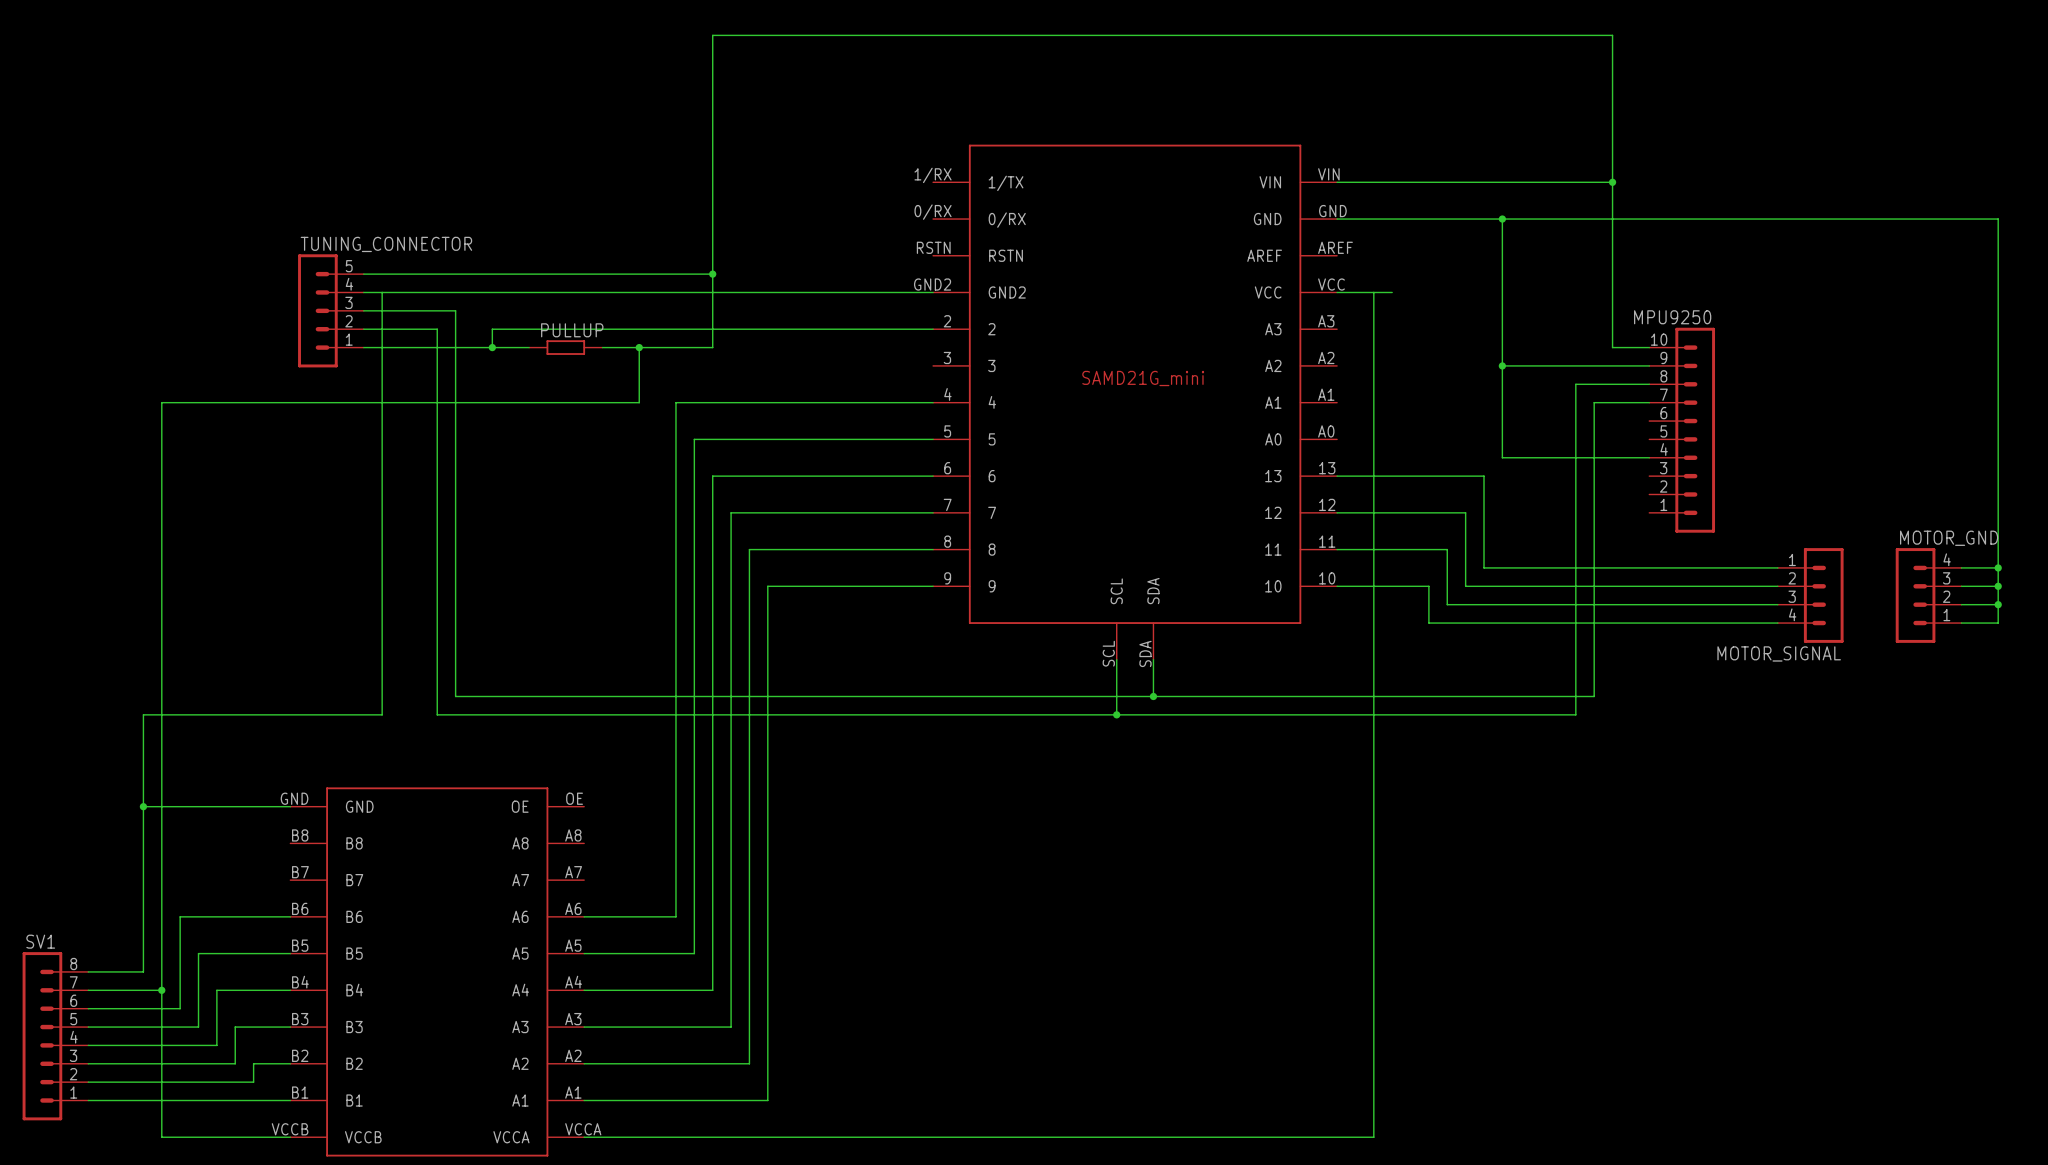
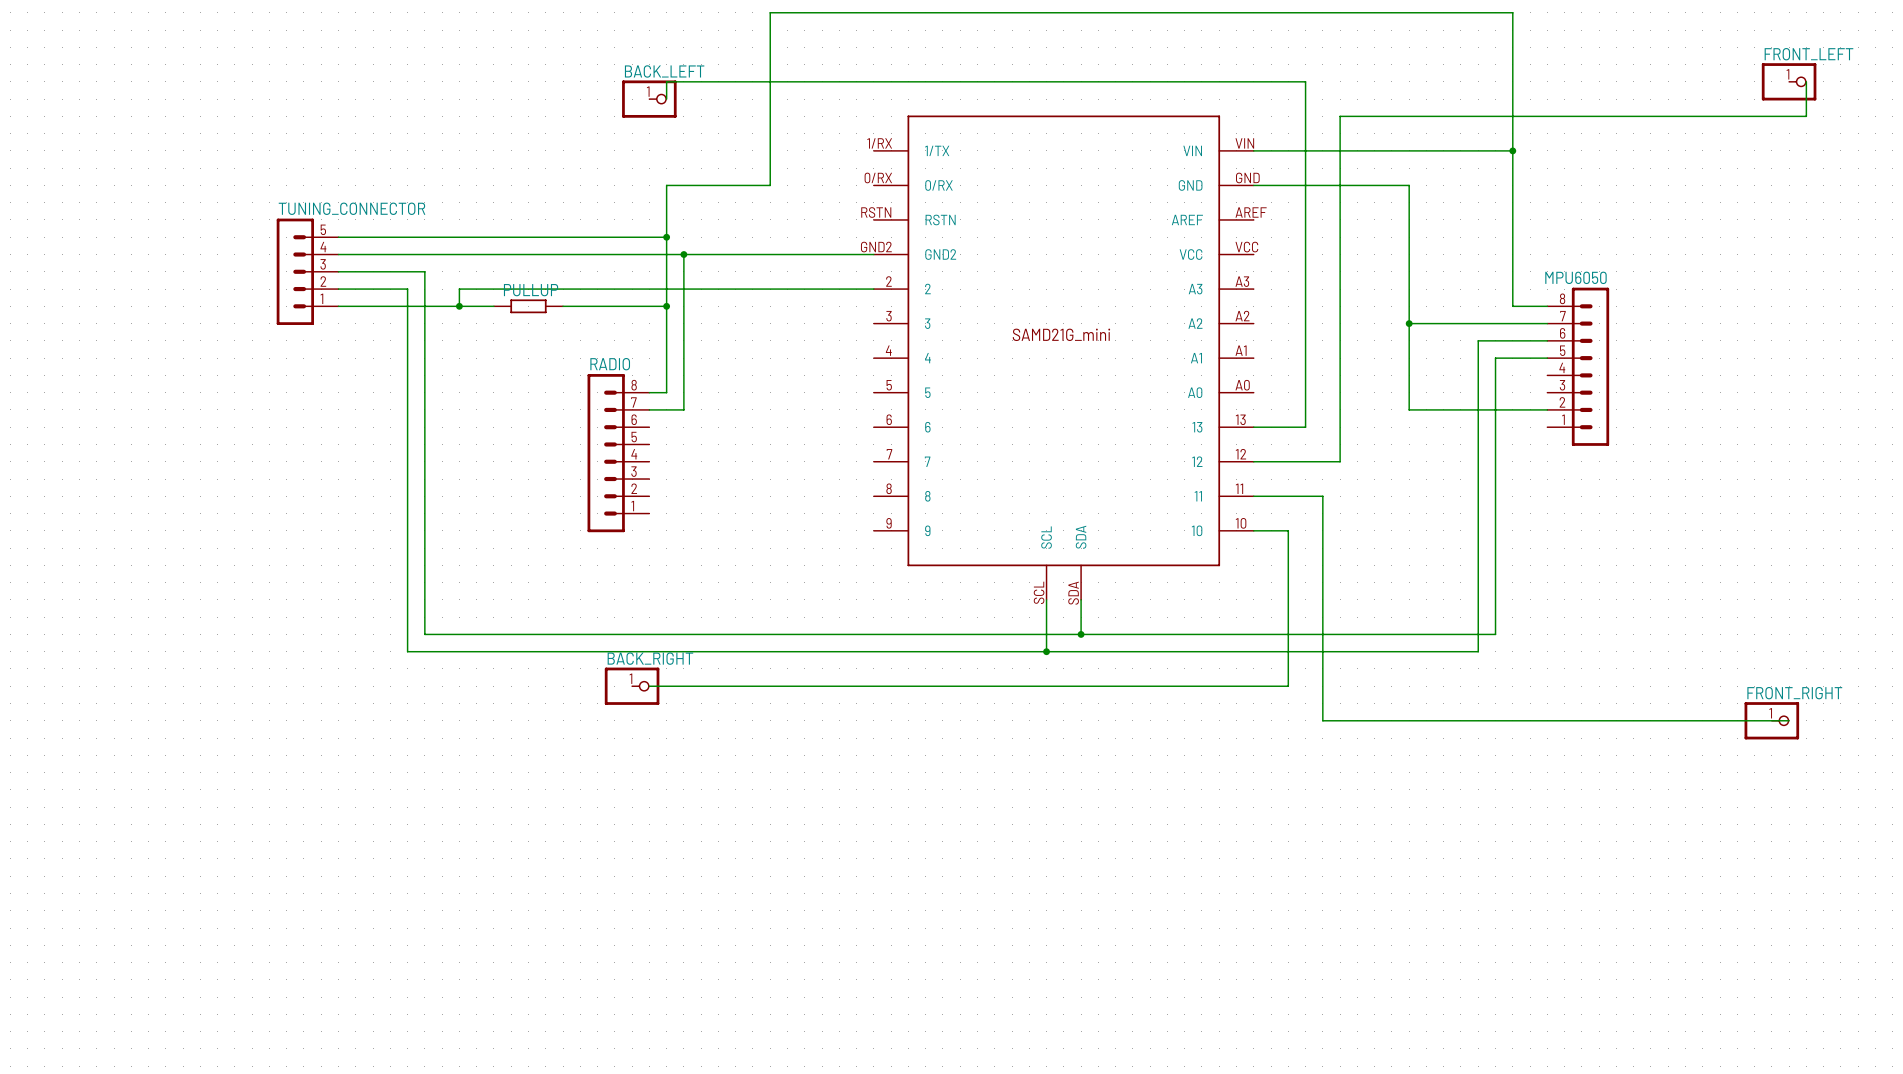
wire: (822, 35) (712, 35) (712, 108) -> (770, 12) (770, 185) (666, 185)
FRONT_LEFT: none -> (1789, 81)
BACK_LEFT: none -> (649, 99)
wire: (712, 127) (712, 219) -> none
wire: (1502, 219) (1998, 219) (1998, 623) (1961, 623) -> none
junction: (1502, 219) -> none
wire: (382, 292) (382, 714) (143, 714) (143, 971) (88, 971) -> none
wire: none -> (683, 254) (683, 409) (649, 409)
junction: none -> (683, 254)
wire: (1337, 292) (1392, 292) -> none
wire: (1373, 292) (1373, 586) (1428, 586) (1428, 623) (1777, 623) -> none
wire: (639, 347) (639, 402) (161, 402) (161, 1137) (290, 1137) -> none
junction: (639, 347) -> none
junction: none -> (666, 306)
wire: (933, 402) (675, 402) (675, 916) (584, 916) -> none
MPU6050: none -> (1578, 366)
MPU9250: (1682, 430) -> none
wire: (694, 439) (694, 953) (584, 953) -> none
wire: (712, 439) (933, 439) -> (666, 392) (666, 306)
wire: (933, 476) (712, 476) (712, 990) (584, 990) -> none
wire: (1392, 476) (1484, 476) (1484, 567) (1777, 567) -> (1305, 427) (1305, 81) (666, 81)
RADIO: none -> (618, 453)
wire: (933, 512) (731, 512) (731, 1027) (584, 1027) -> none
wire: (1428, 512) (1465, 512) (1465, 586) (1777, 586) -> (1340, 461) (1340, 116) (1806, 116) (1806, 81)
wire: (933, 549) (749, 549) (749, 1063) (584, 1063) -> none
wire: (1410, 549) (1447, 549) (1447, 604) (1777, 604) -> (1322, 496) (1322, 720) (1789, 720)
wire: (1961, 567) (1998, 567) -> none
junction: (1998, 567) -> none
wire: (933, 586) (767, 586) (767, 1100) (584, 1100) -> none
wire: (1961, 586) (1998, 586) -> none
junction: (1998, 586) -> none
MOTOR_SIGNAL: (1810, 595) -> none
MOTOR_GND: (1928, 595) -> none
wire: (1961, 604) (1998, 604) -> none
junction: (1998, 604) -> none
BACK_RIGHT: none -> (632, 686)
wire: (1373, 751) (1373, 1137) (584, 1137) -> (1288, 686) (649, 686)
FRONT_RIGHT: none -> (1771, 720)
wire: (143, 806) (290, 806) -> none
junction: (143, 806) -> none
wire: (290, 916) (180, 916) (180, 1008) (88, 1008) -> none
wire: (290, 953) (198, 953) (198, 1027) (88, 1027) -> none
part: (437, 971) -> none
wire: (88, 990) (161, 990) -> none
junction: (161, 990) -> none
wire: (290, 990) (216, 990) (216, 1045) (88, 1045) -> none
wire: (290, 1027) (235, 1027) (235, 1063) (88, 1063) -> none
SV1: (55, 1036) -> none
wire: (290, 1063) (253, 1063) (253, 1082) (88, 1082) -> none
wire: (88, 1100) (290, 1100) -> none

